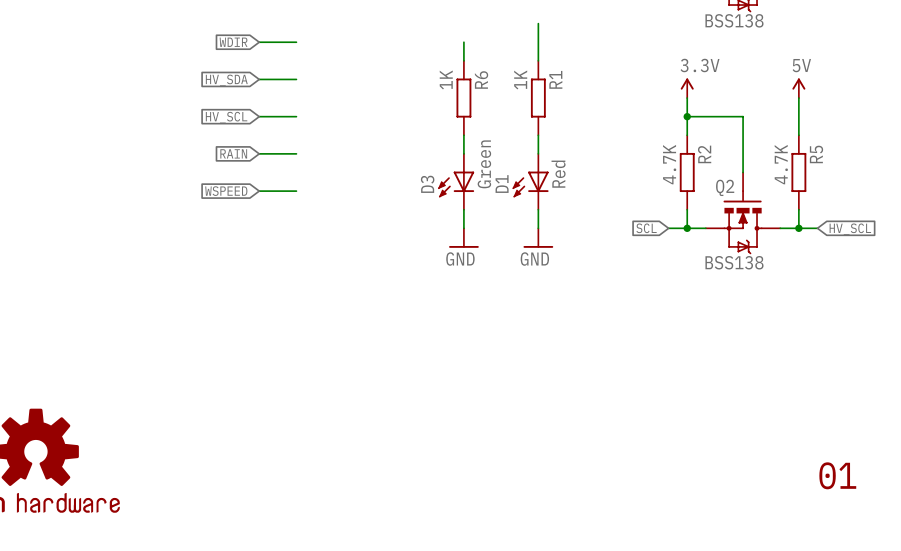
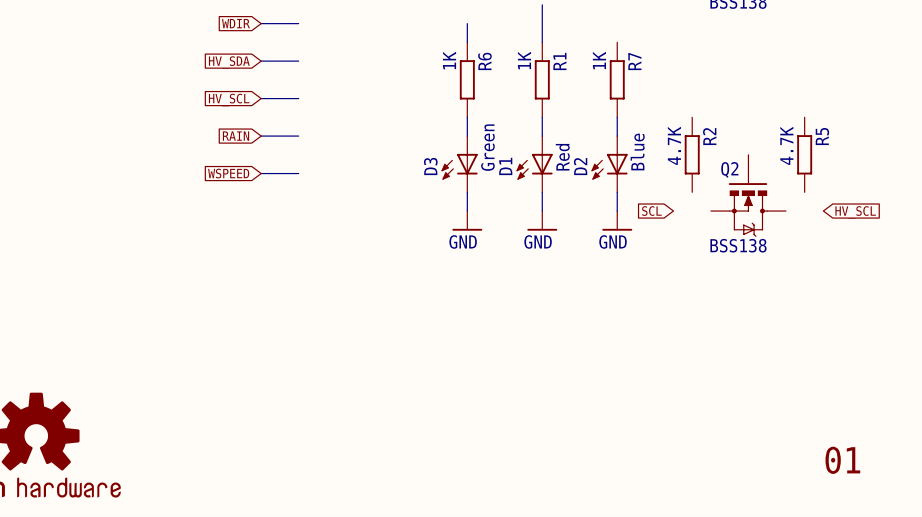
power symbol: 3.3V (687, 88) -> none
power symbol: 5V (798, 88) -> none
R7: none -> 1K (617, 79)
wire: (687, 98) (687, 135) -> none
wire: (798, 98) (798, 135) -> none
wire: (687, 116) (743, 116) (743, 172) -> none
junction: (687, 116) -> none
wire: none -> (617, 117) (617, 136)
D2: none -> Blue (609, 164)
wire: (687, 209) (687, 228) -> (617, 192) (617, 211)
wire: (798, 209) (798, 228) -> none
wire: (668, 228) (705, 228) -> none
junction: (687, 228) -> none
wire: (780, 228) (817, 228) -> none
junction: (798, 228) -> none
power symbol: none -> GND (617, 220)

